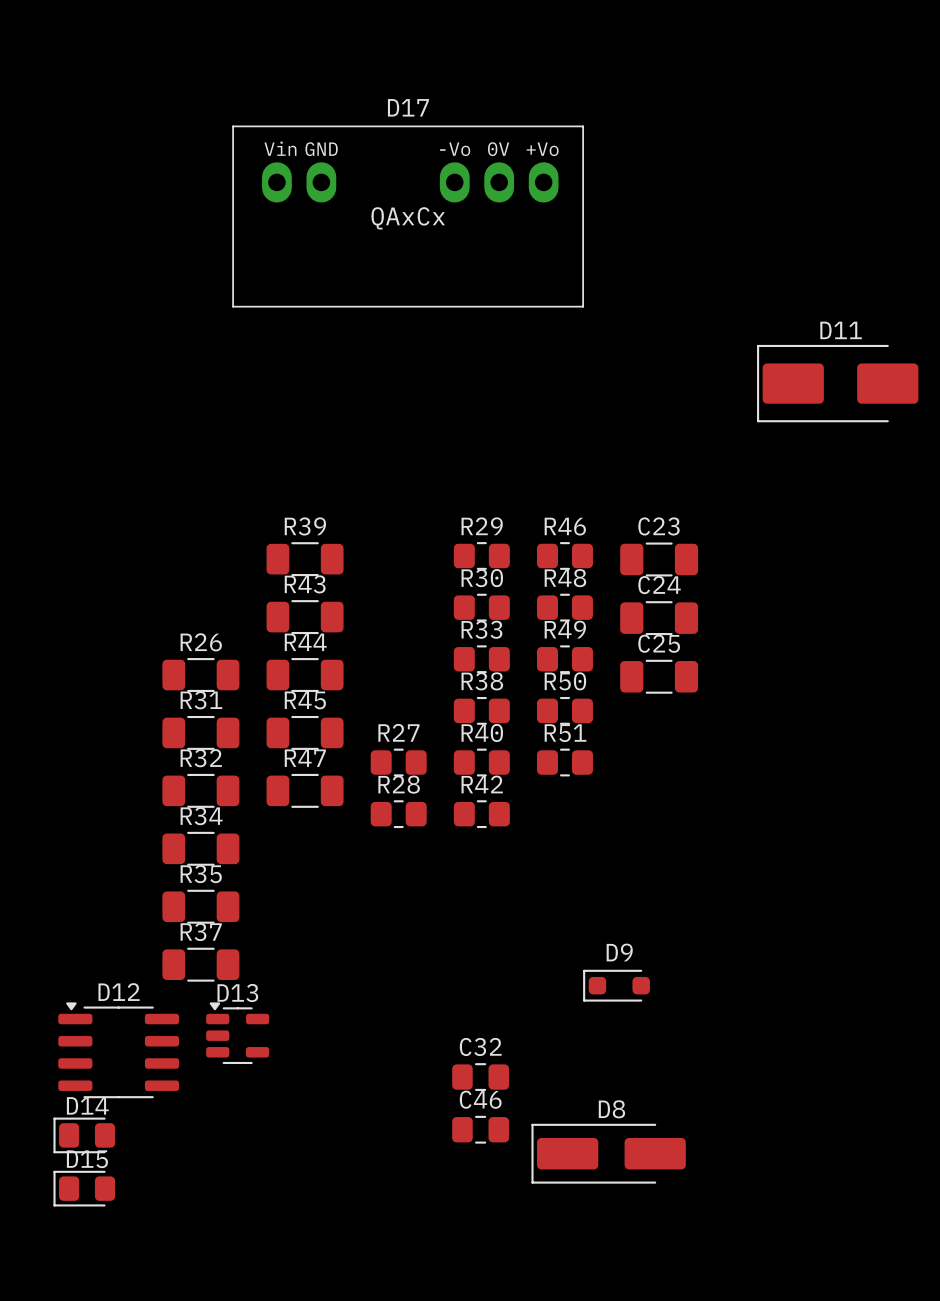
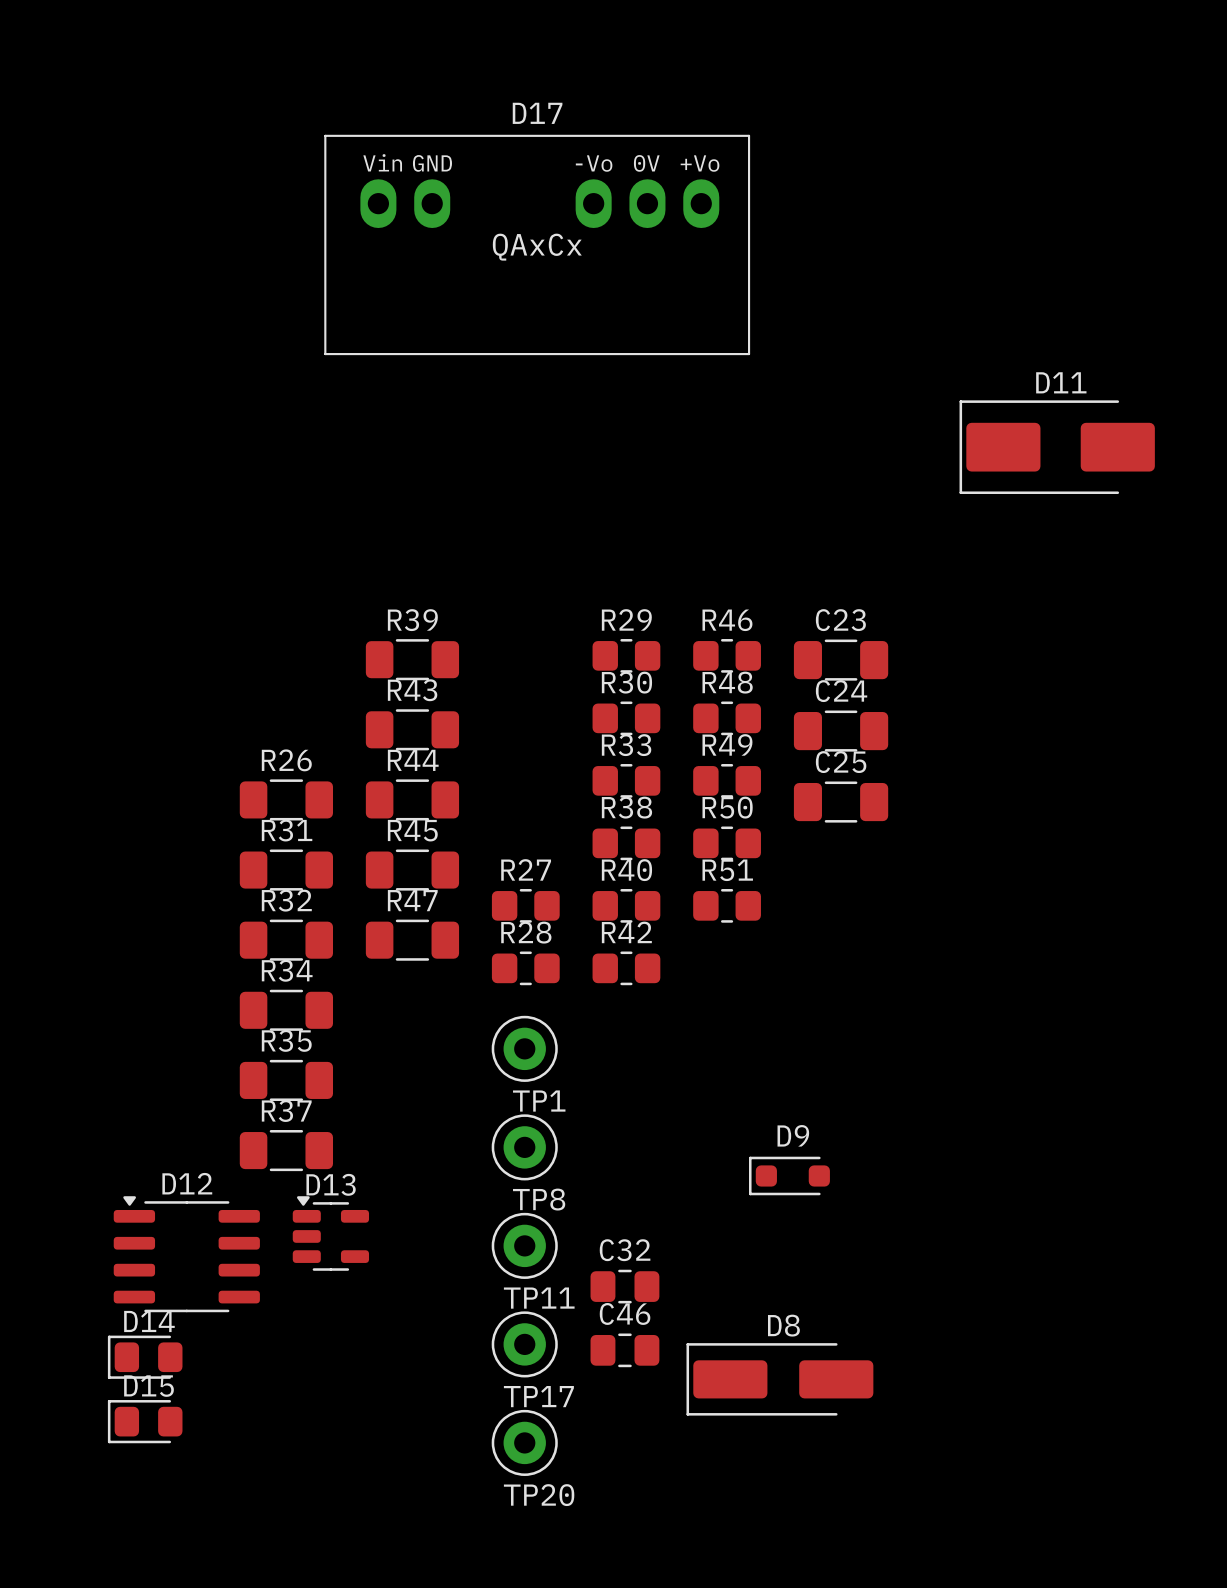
TP1: none -> (524, 1048)
TP8: none -> (524, 1147)
TP11: none -> (524, 1245)
TP17: none -> (524, 1344)
TP20: none -> (524, 1442)

